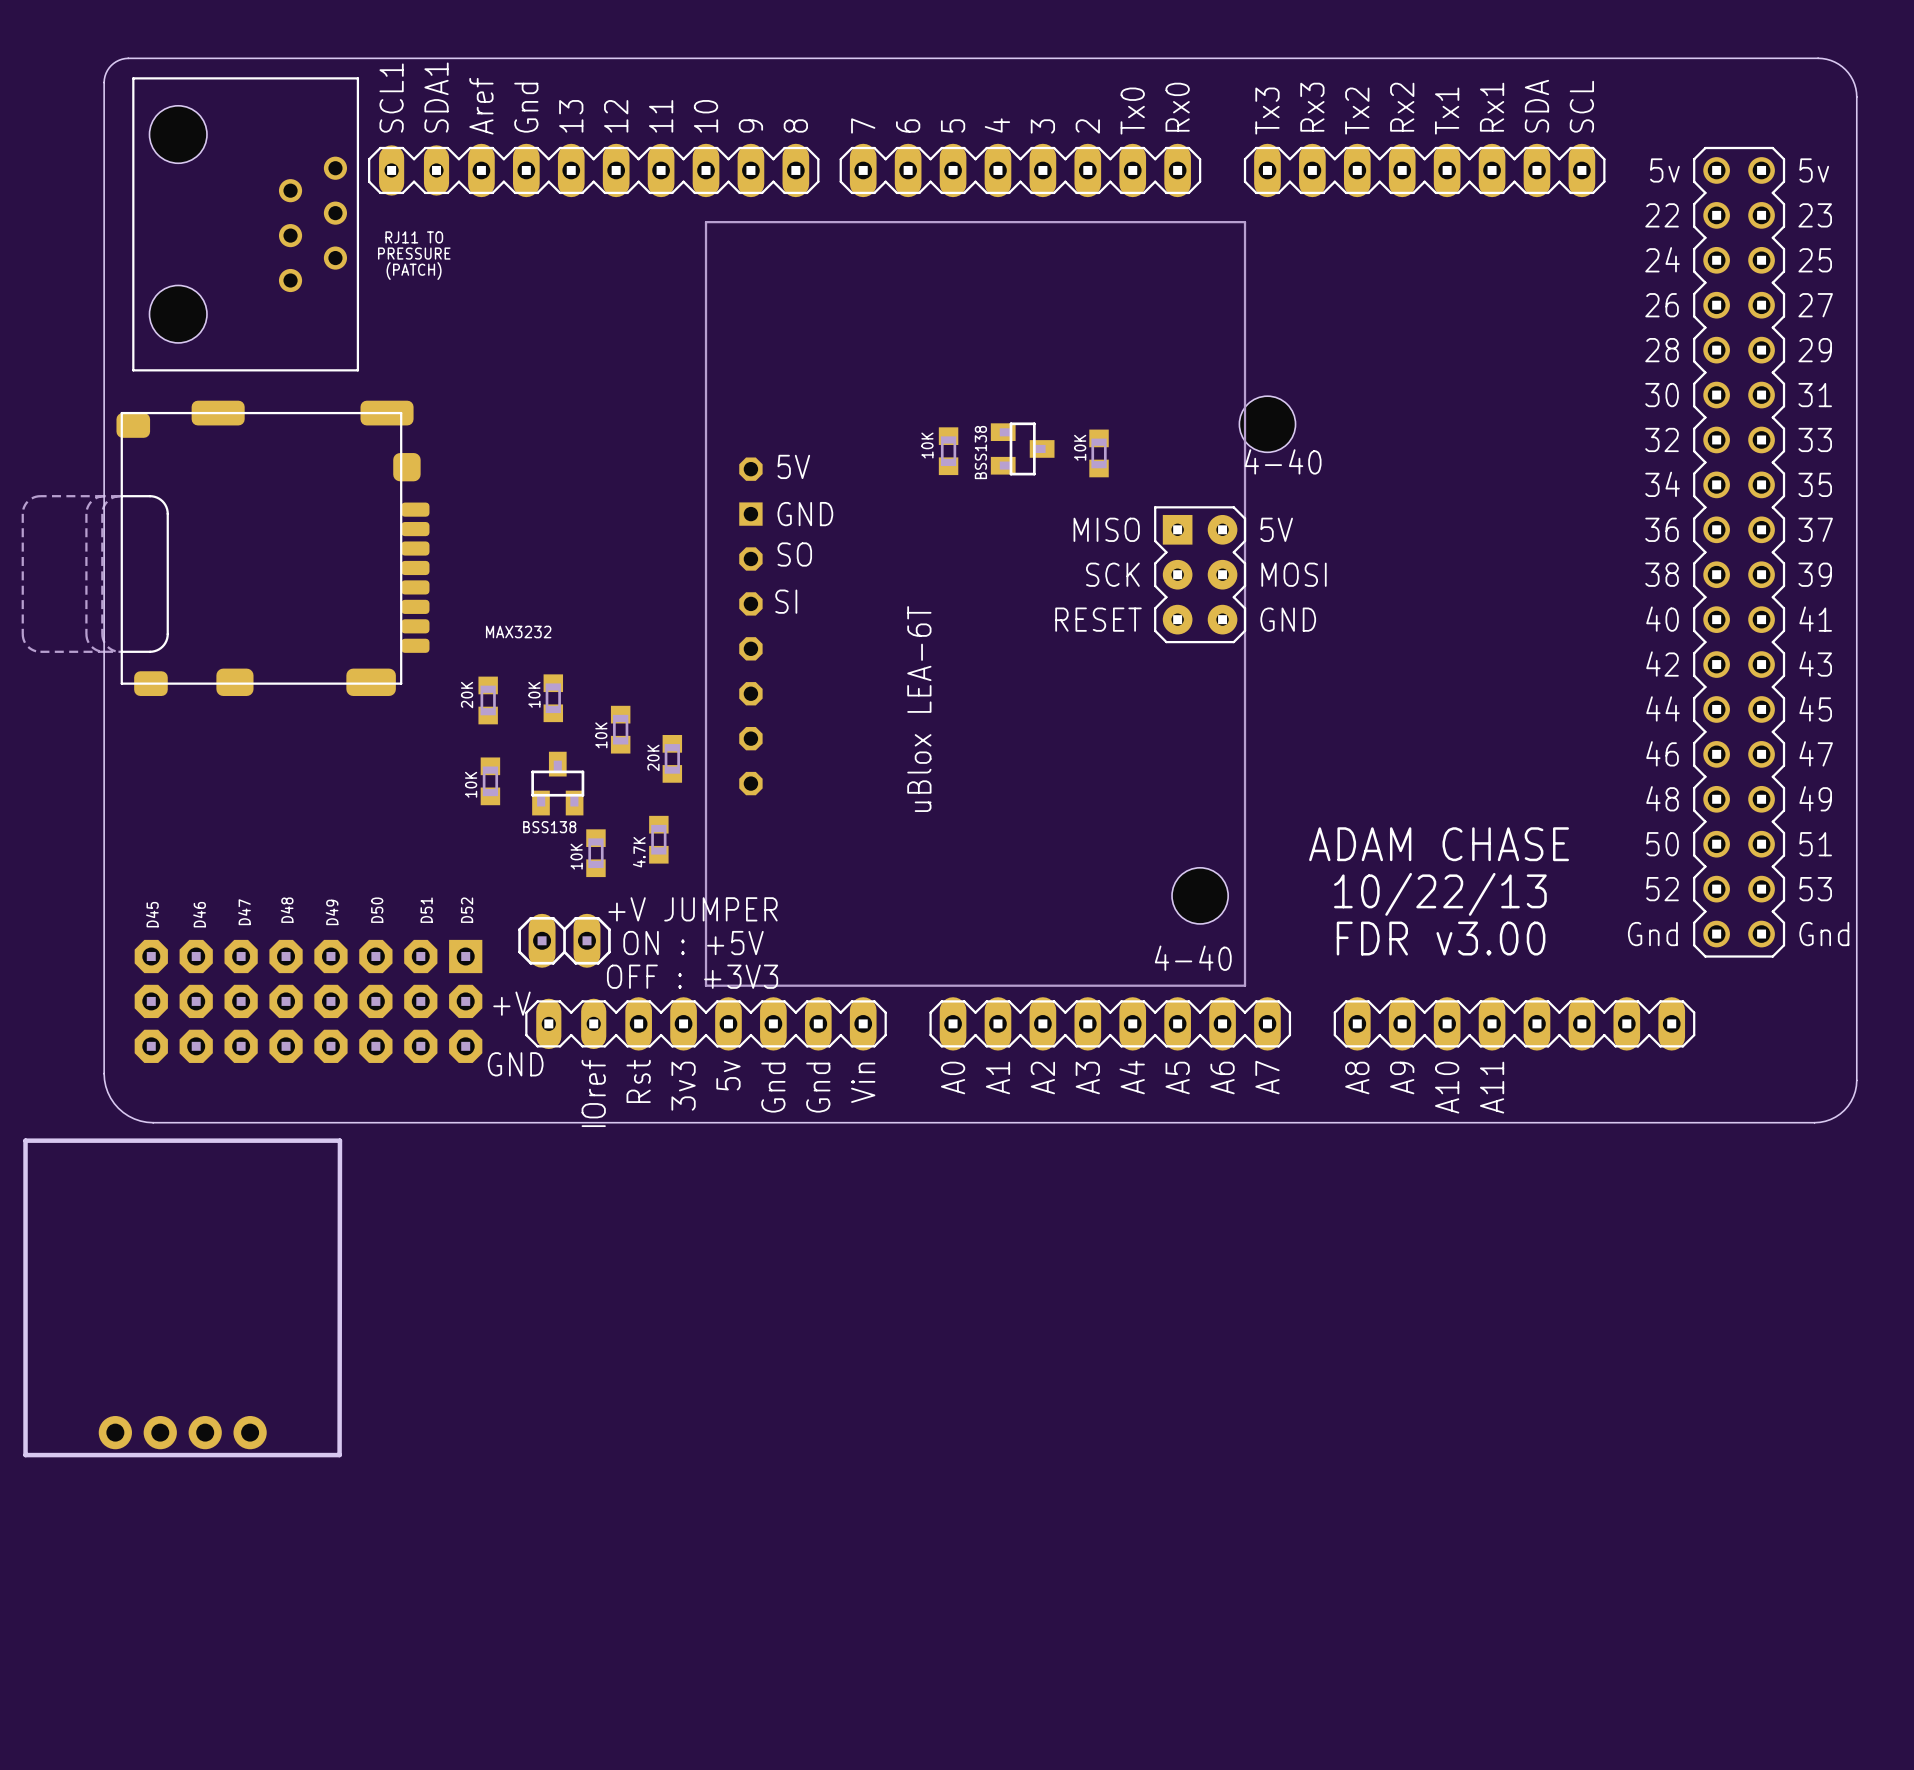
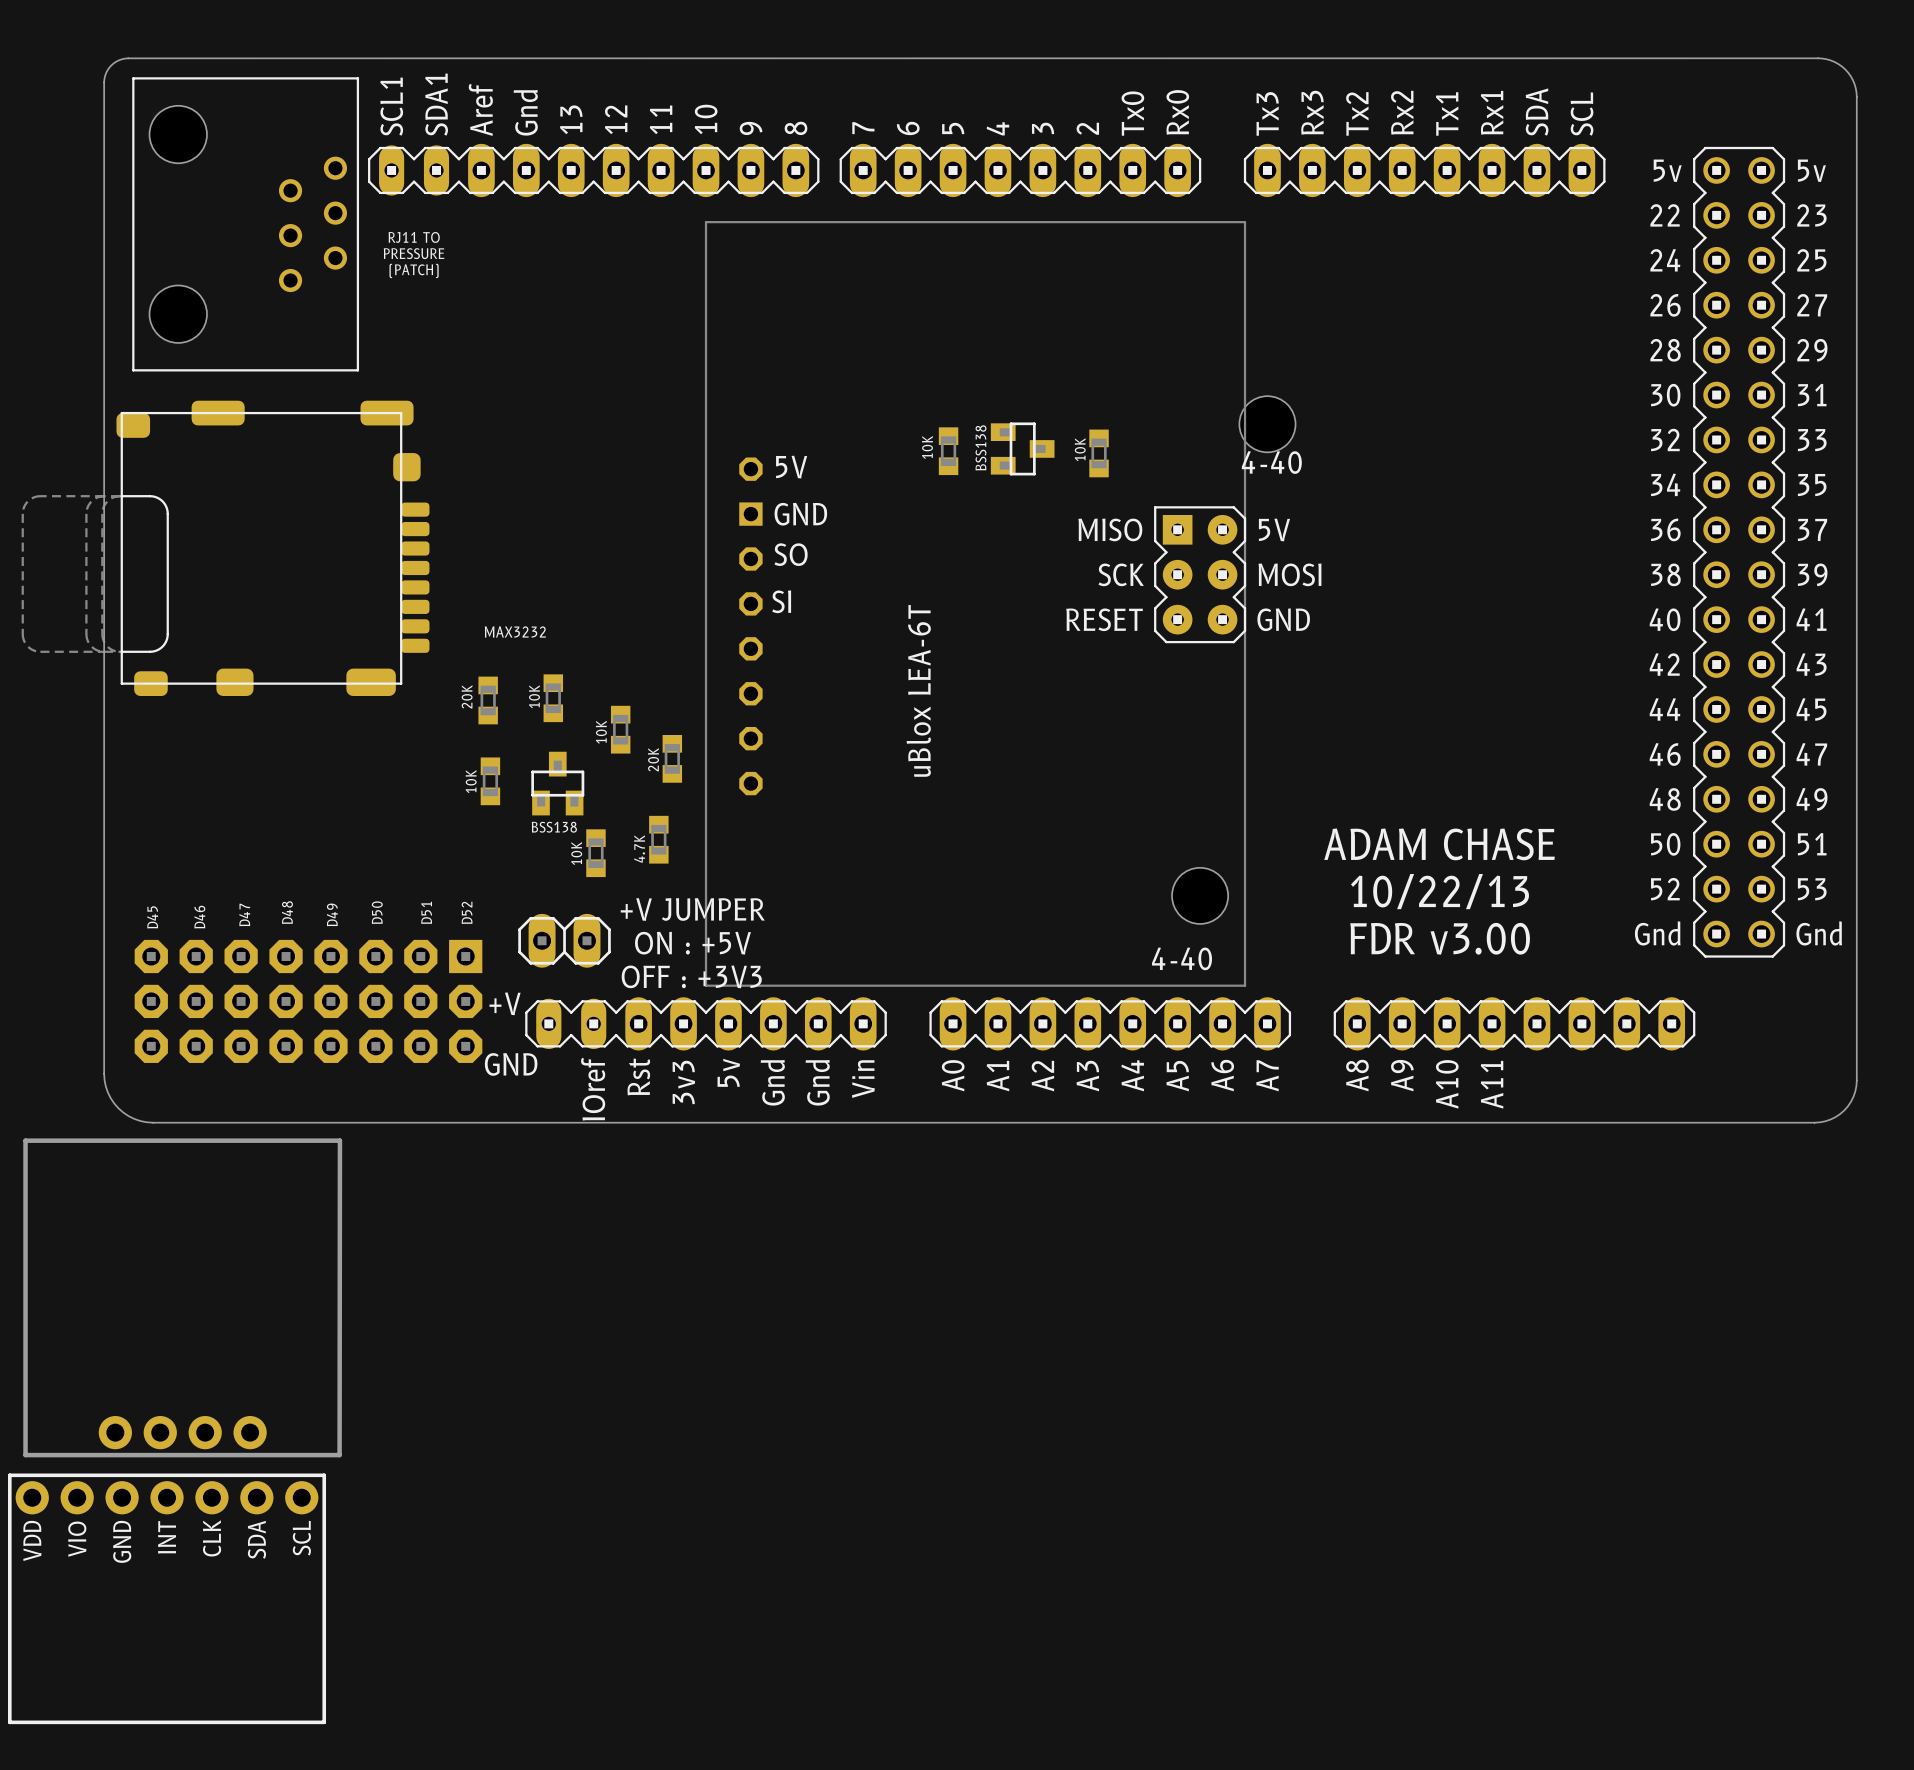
part: none -> (167, 1598)

